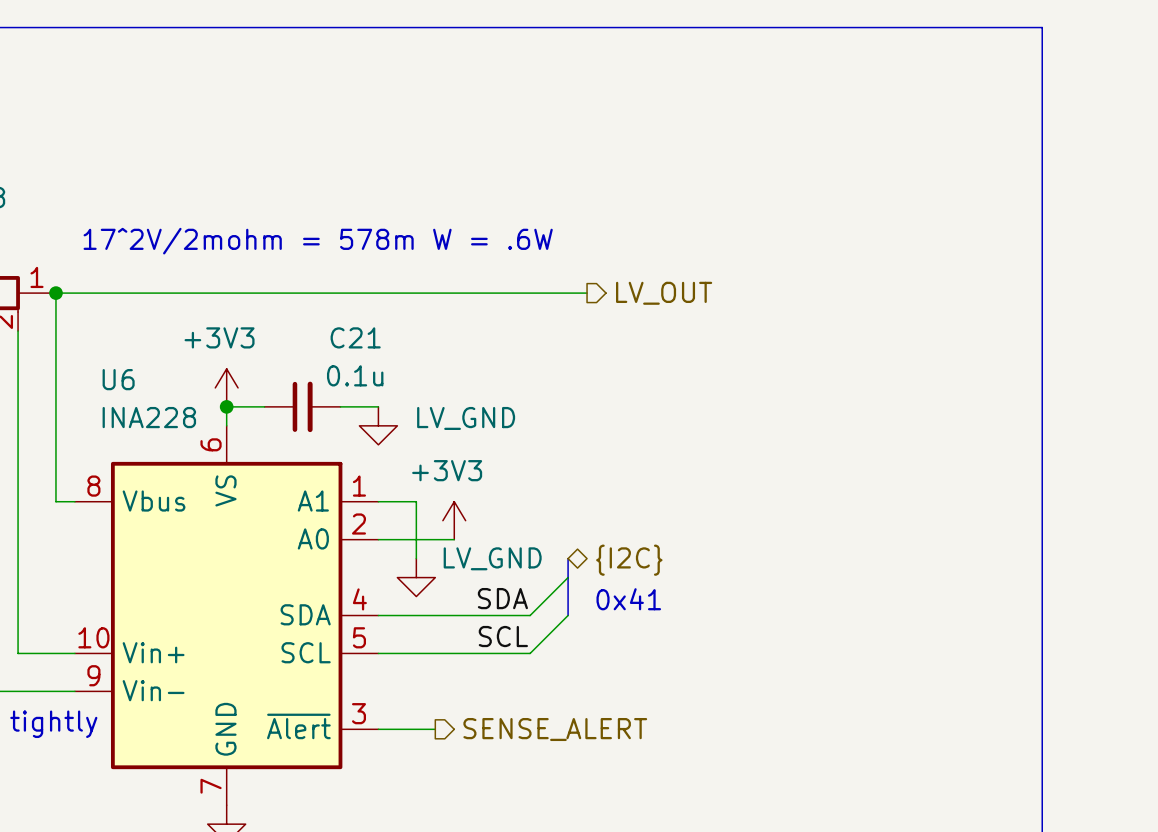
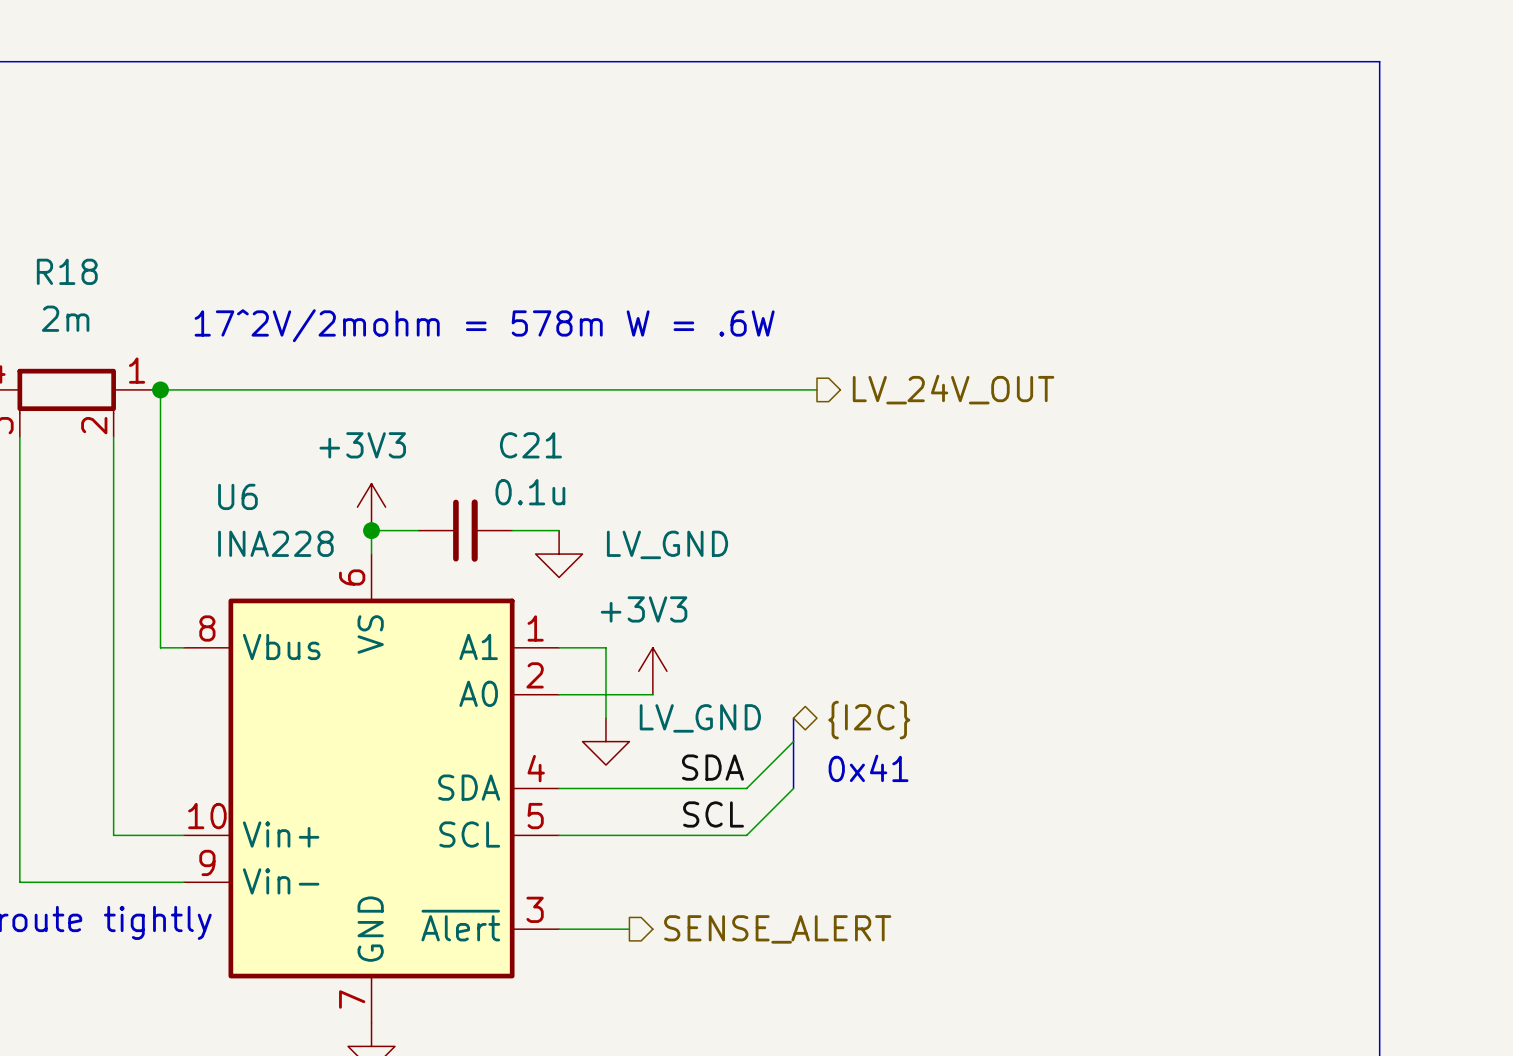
hierarchical label: LV_OUT (664, 293) -> LV_24V_OUT (953, 389)

